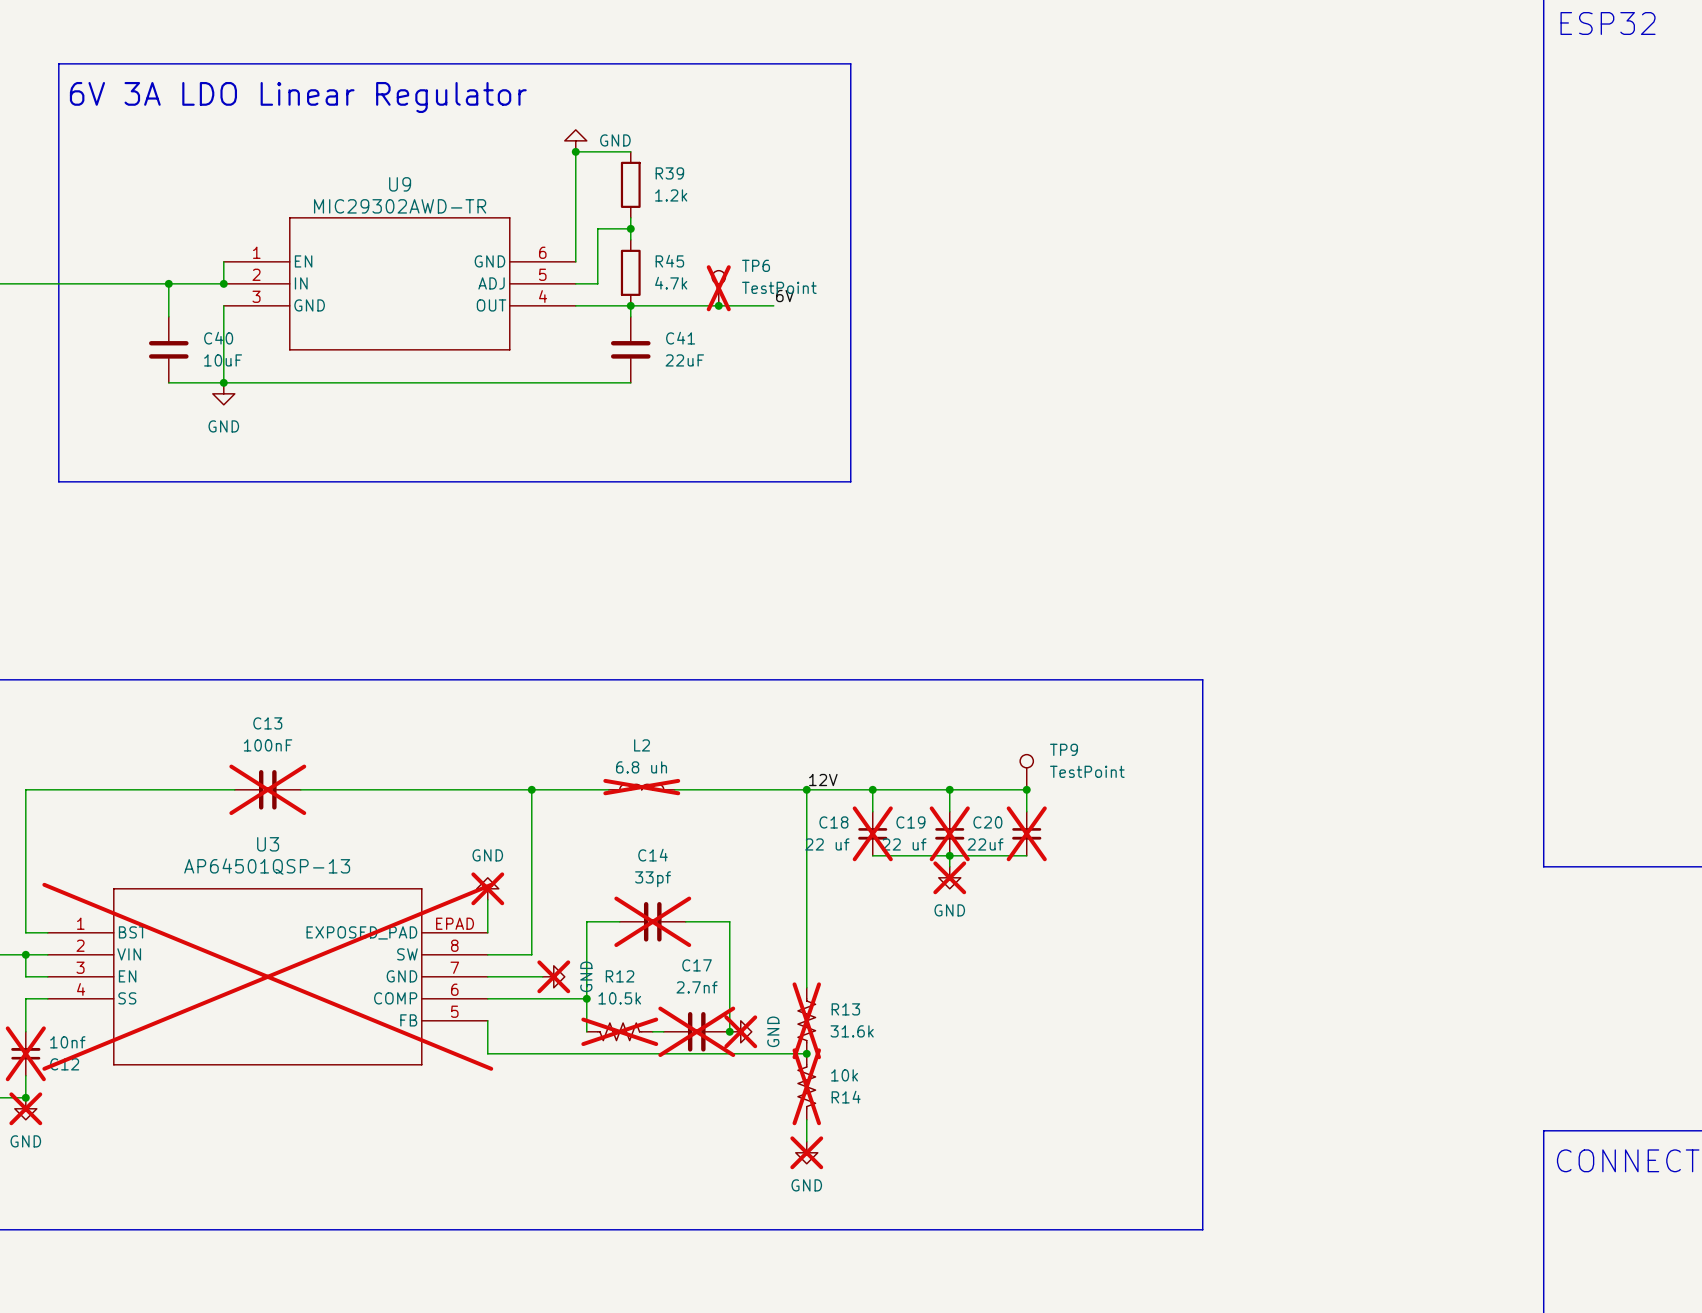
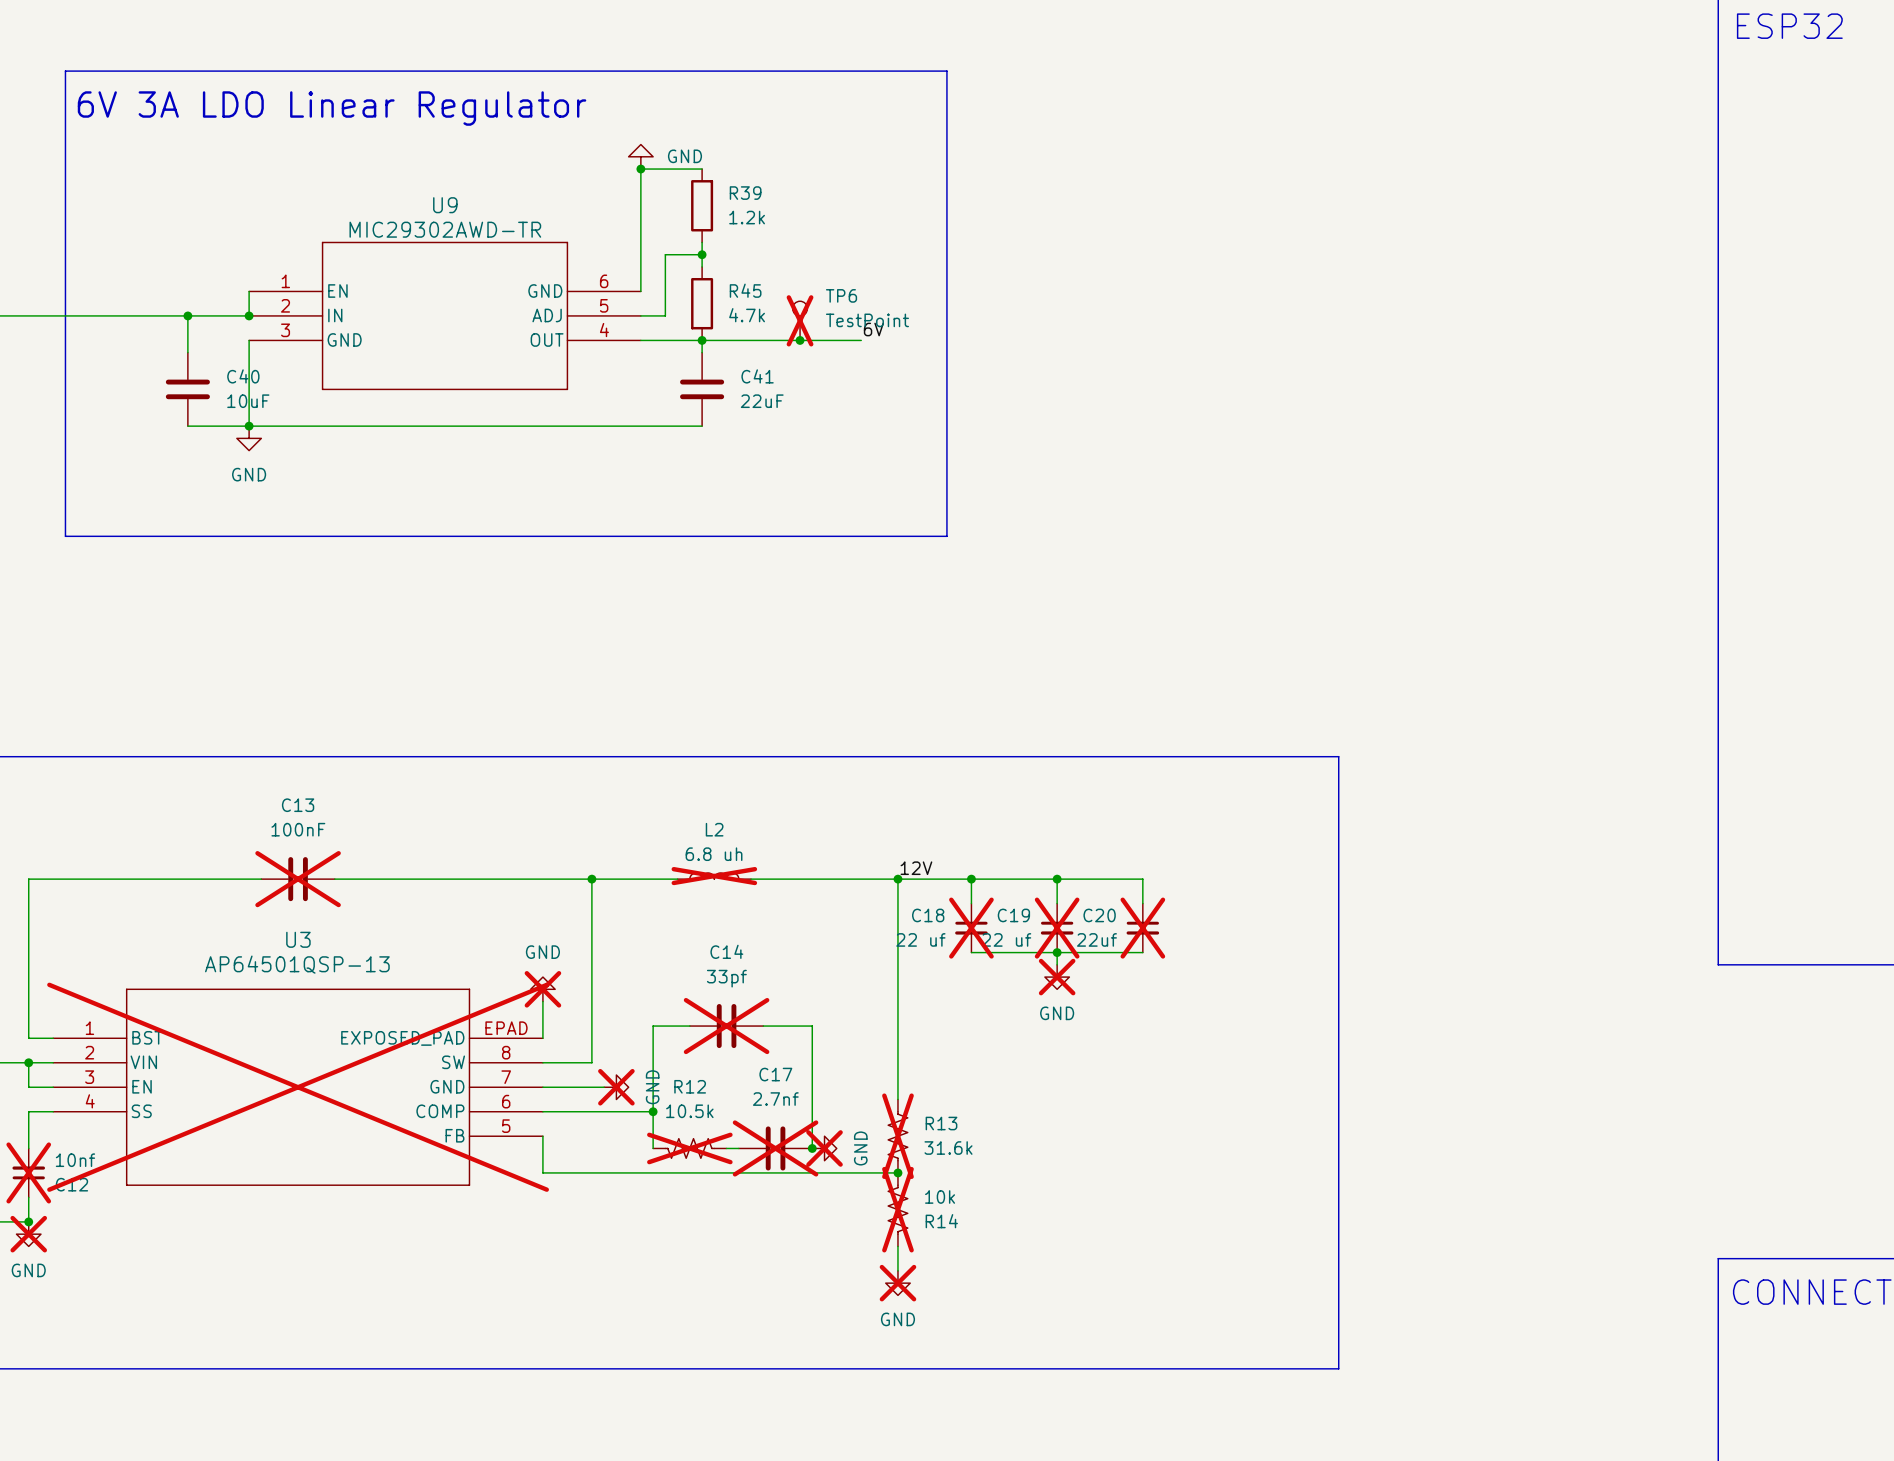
TP9: TestPoint (1026, 772) -> none
junction: (1026, 789) -> none

